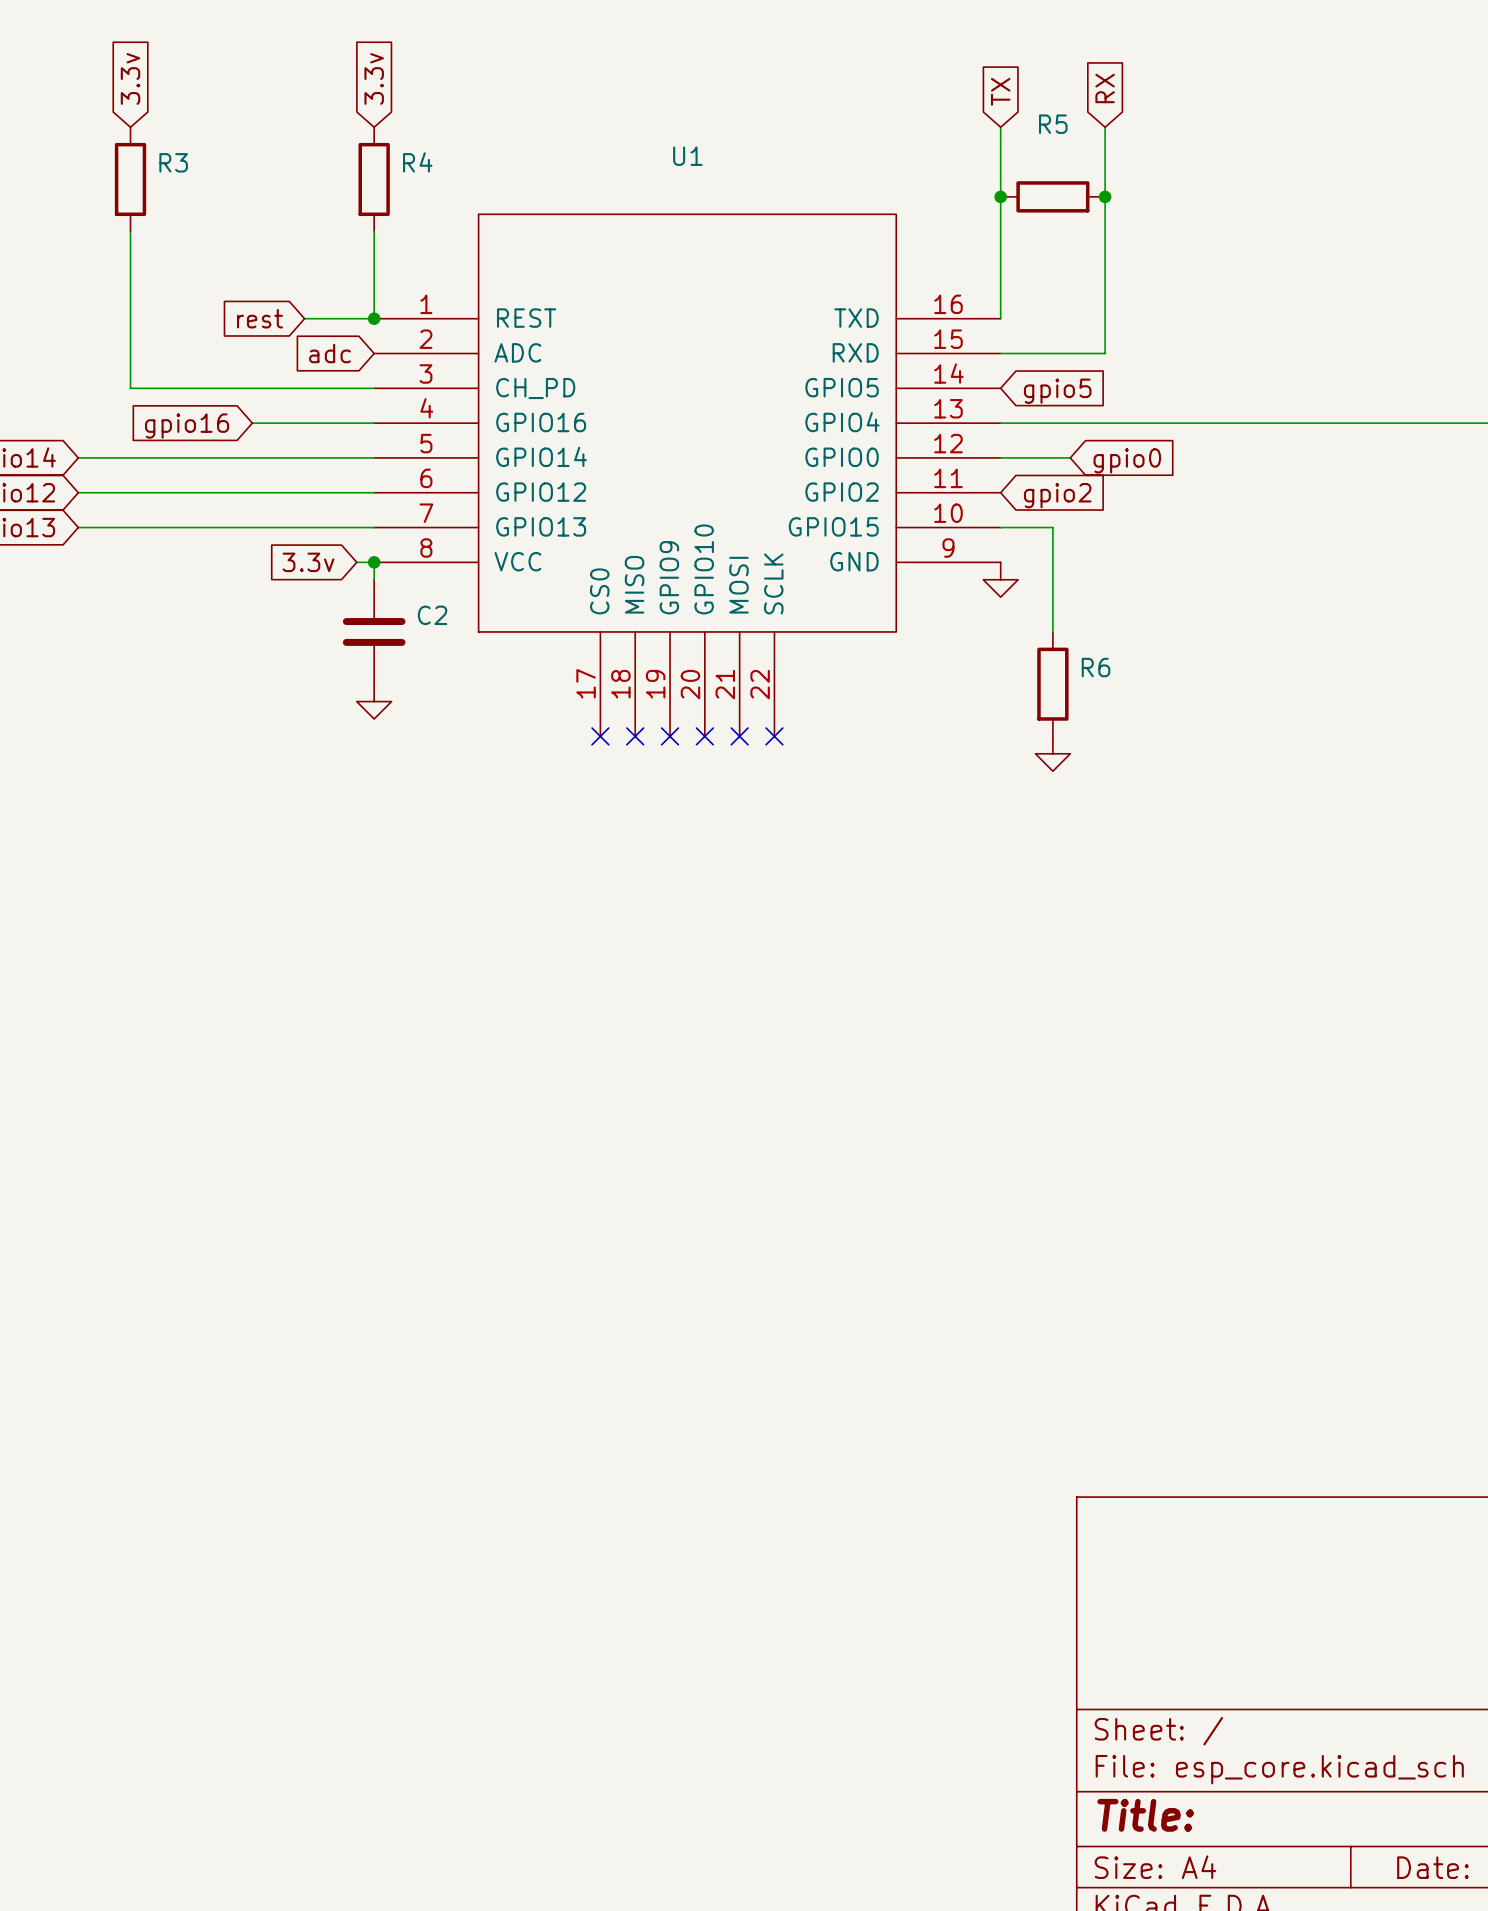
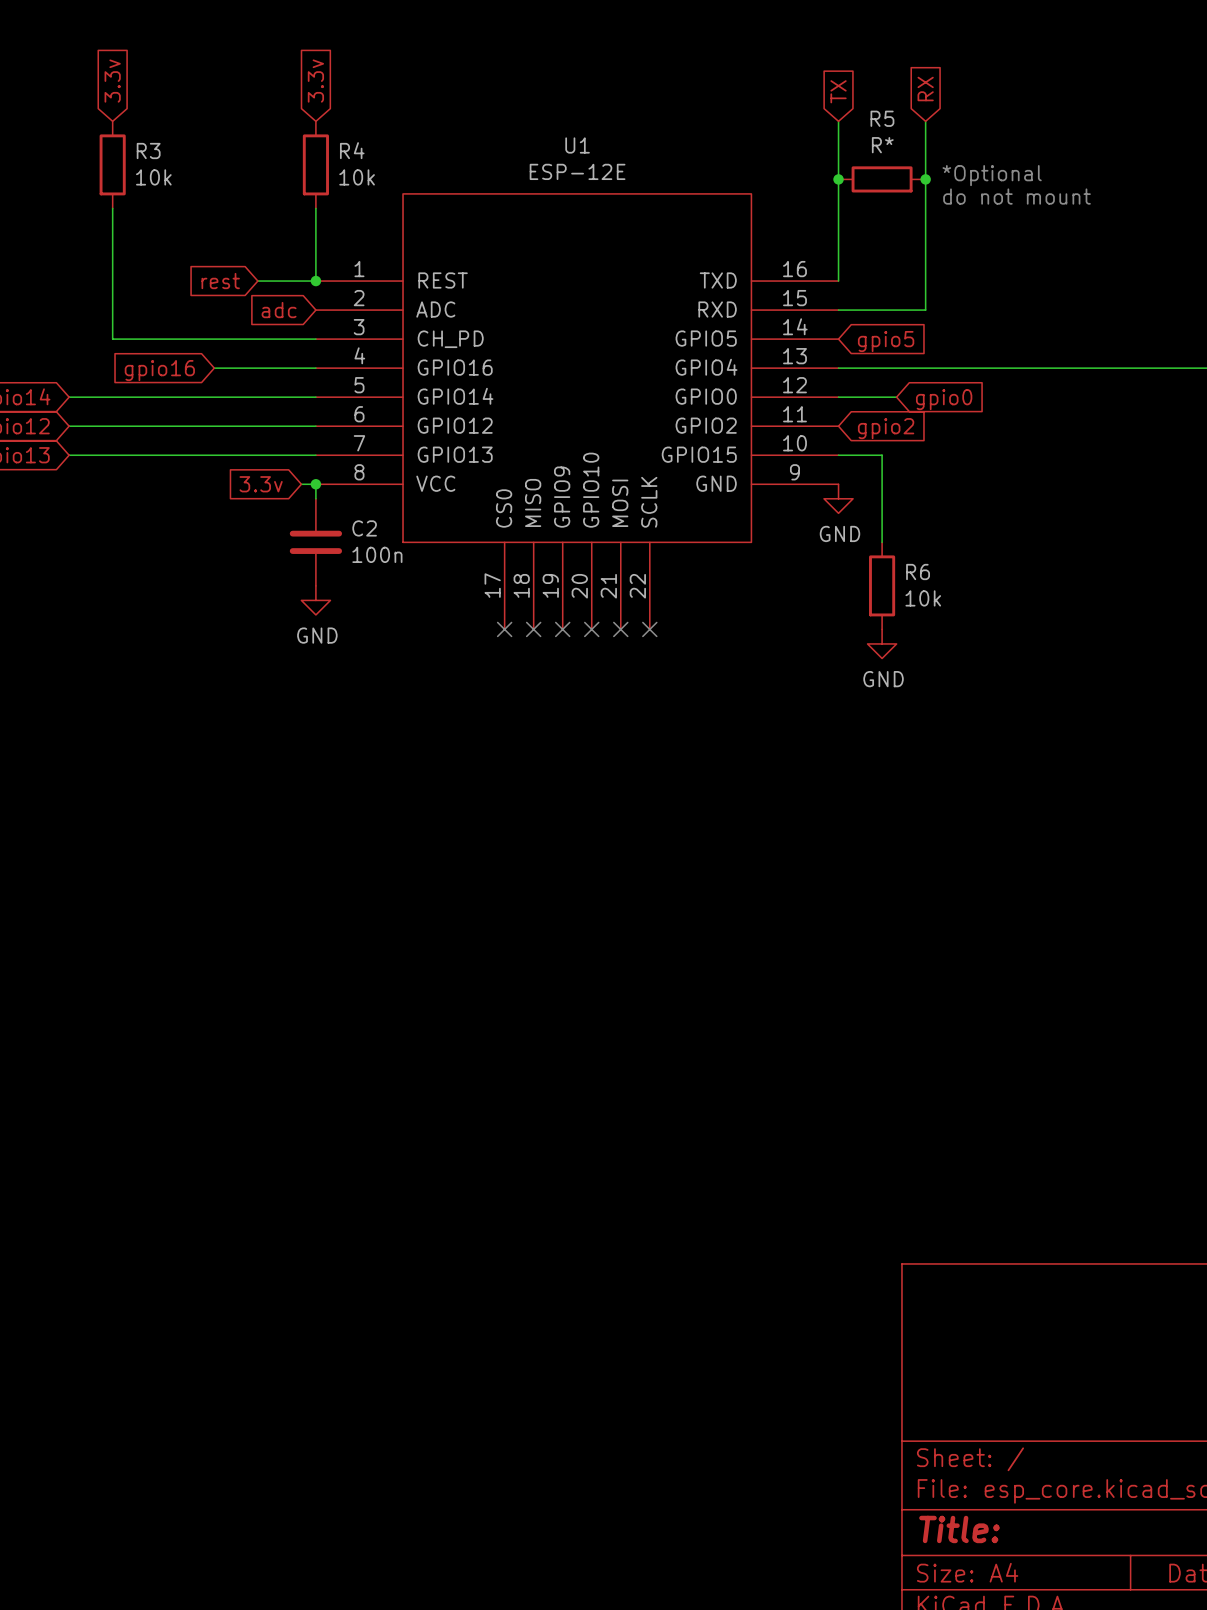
R5 value: none -> R* (882, 145)
U1 value: none -> ESP-12E (577, 171)
text: none -> *Optional (992, 175)
R3 value: none -> 10k (153, 177)
R4 value: none -> 10k (357, 177)
text: none -> do not mount (1017, 196)
power symbol text: none -> GND (839, 533)
C2 value: none -> 100n (377, 554)
R6 value: none -> 10k (923, 598)
power symbol text: none -> GND (317, 635)
power symbol text: none -> GND (883, 679)

